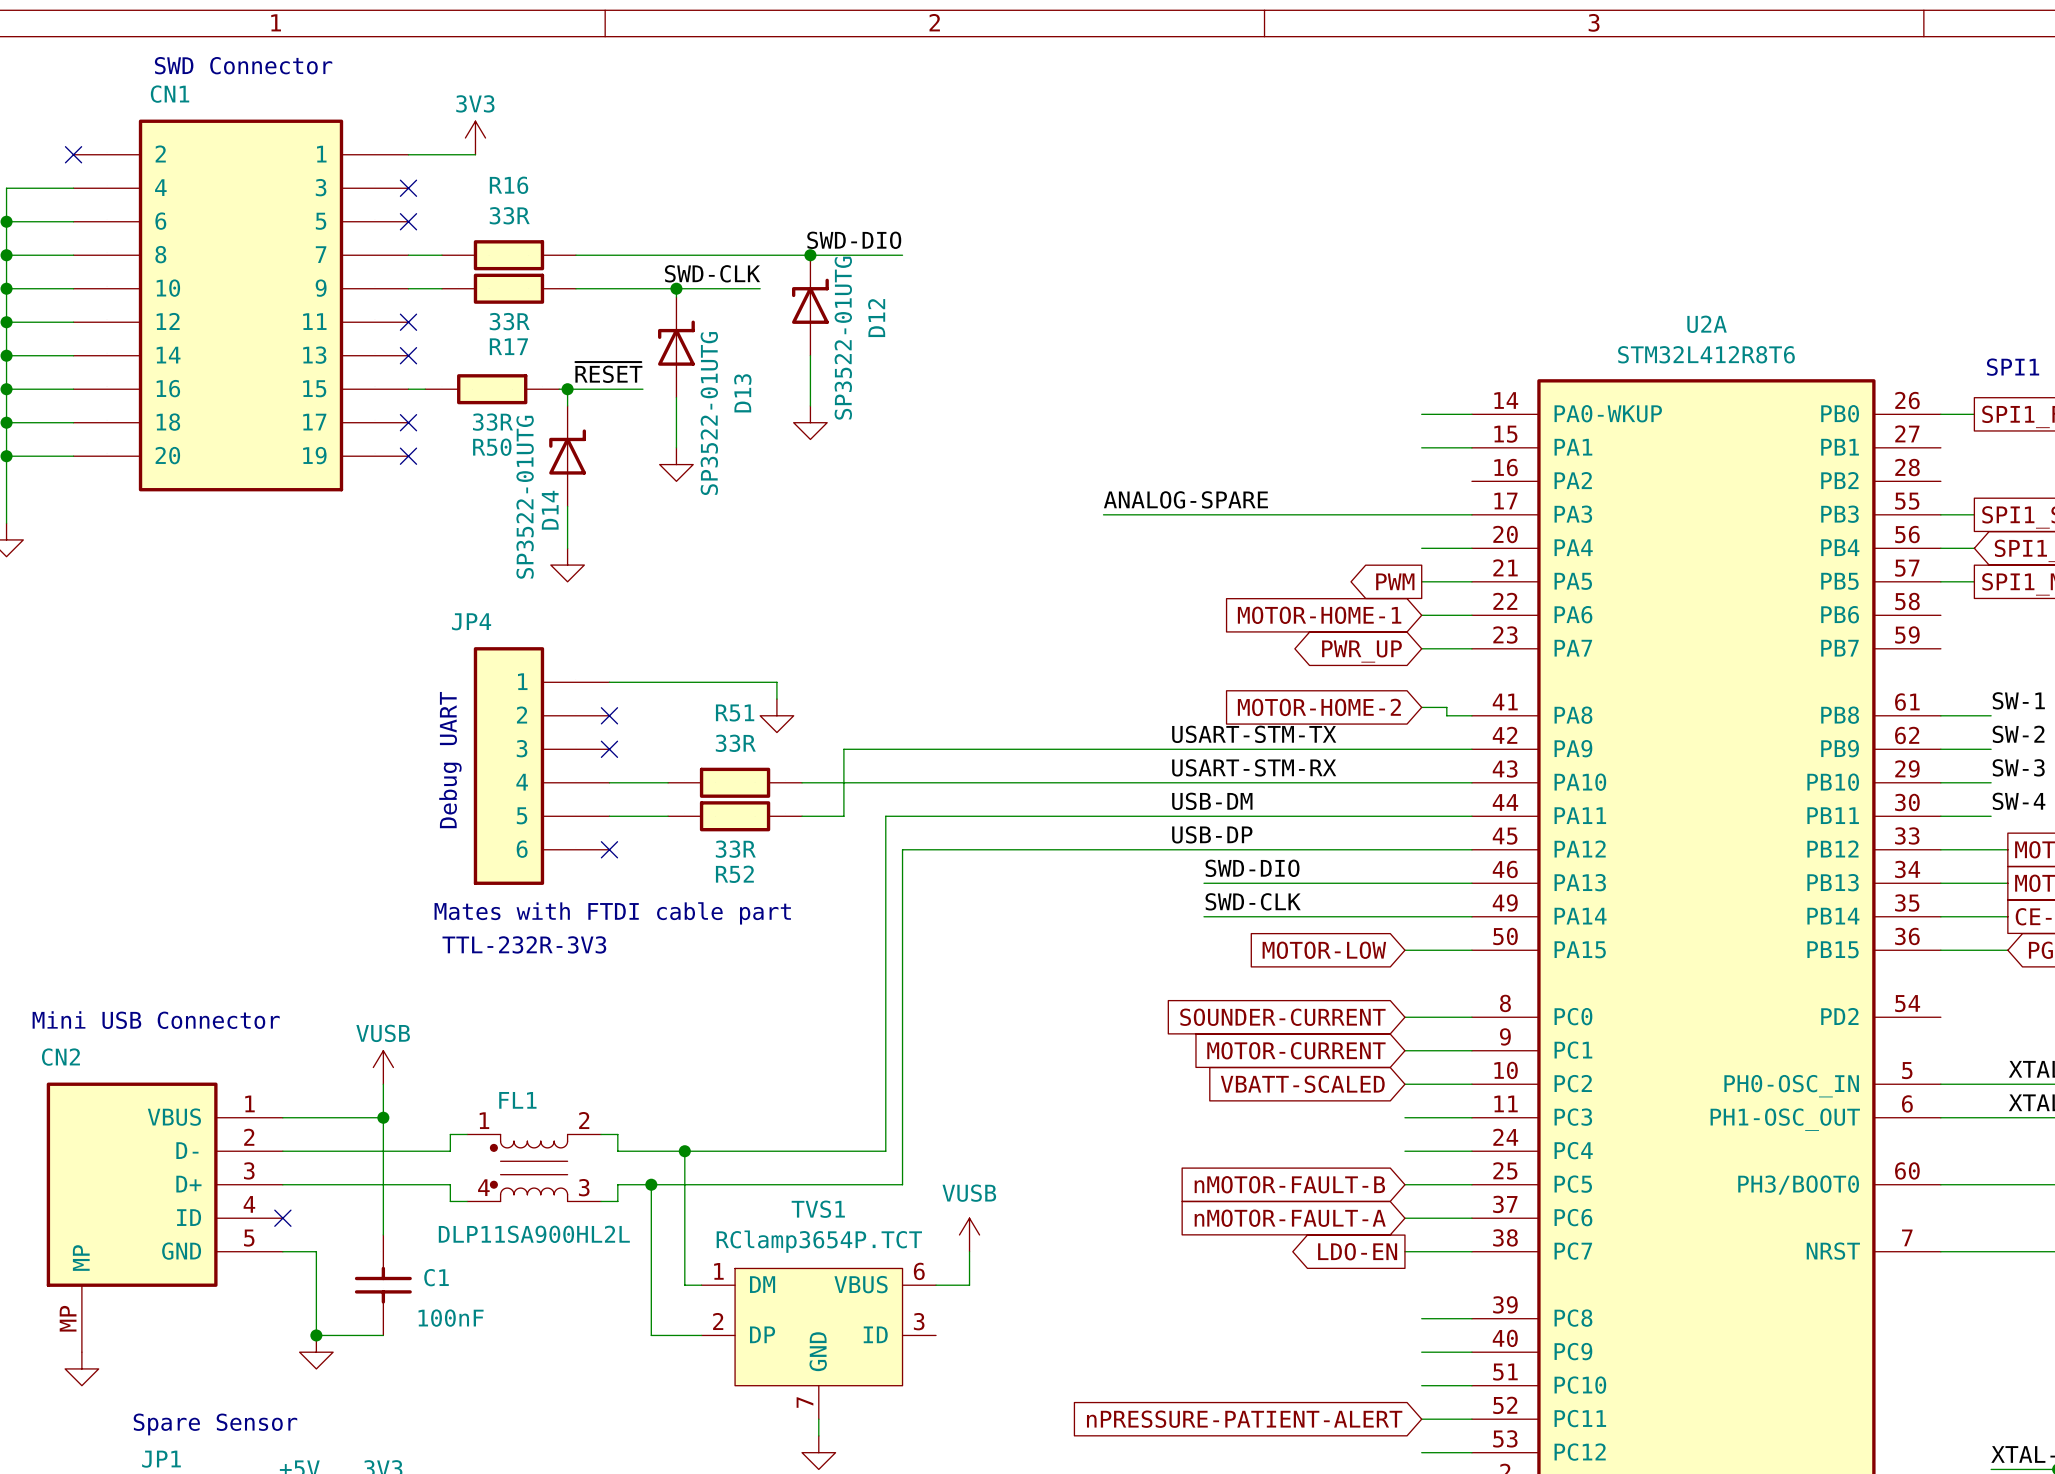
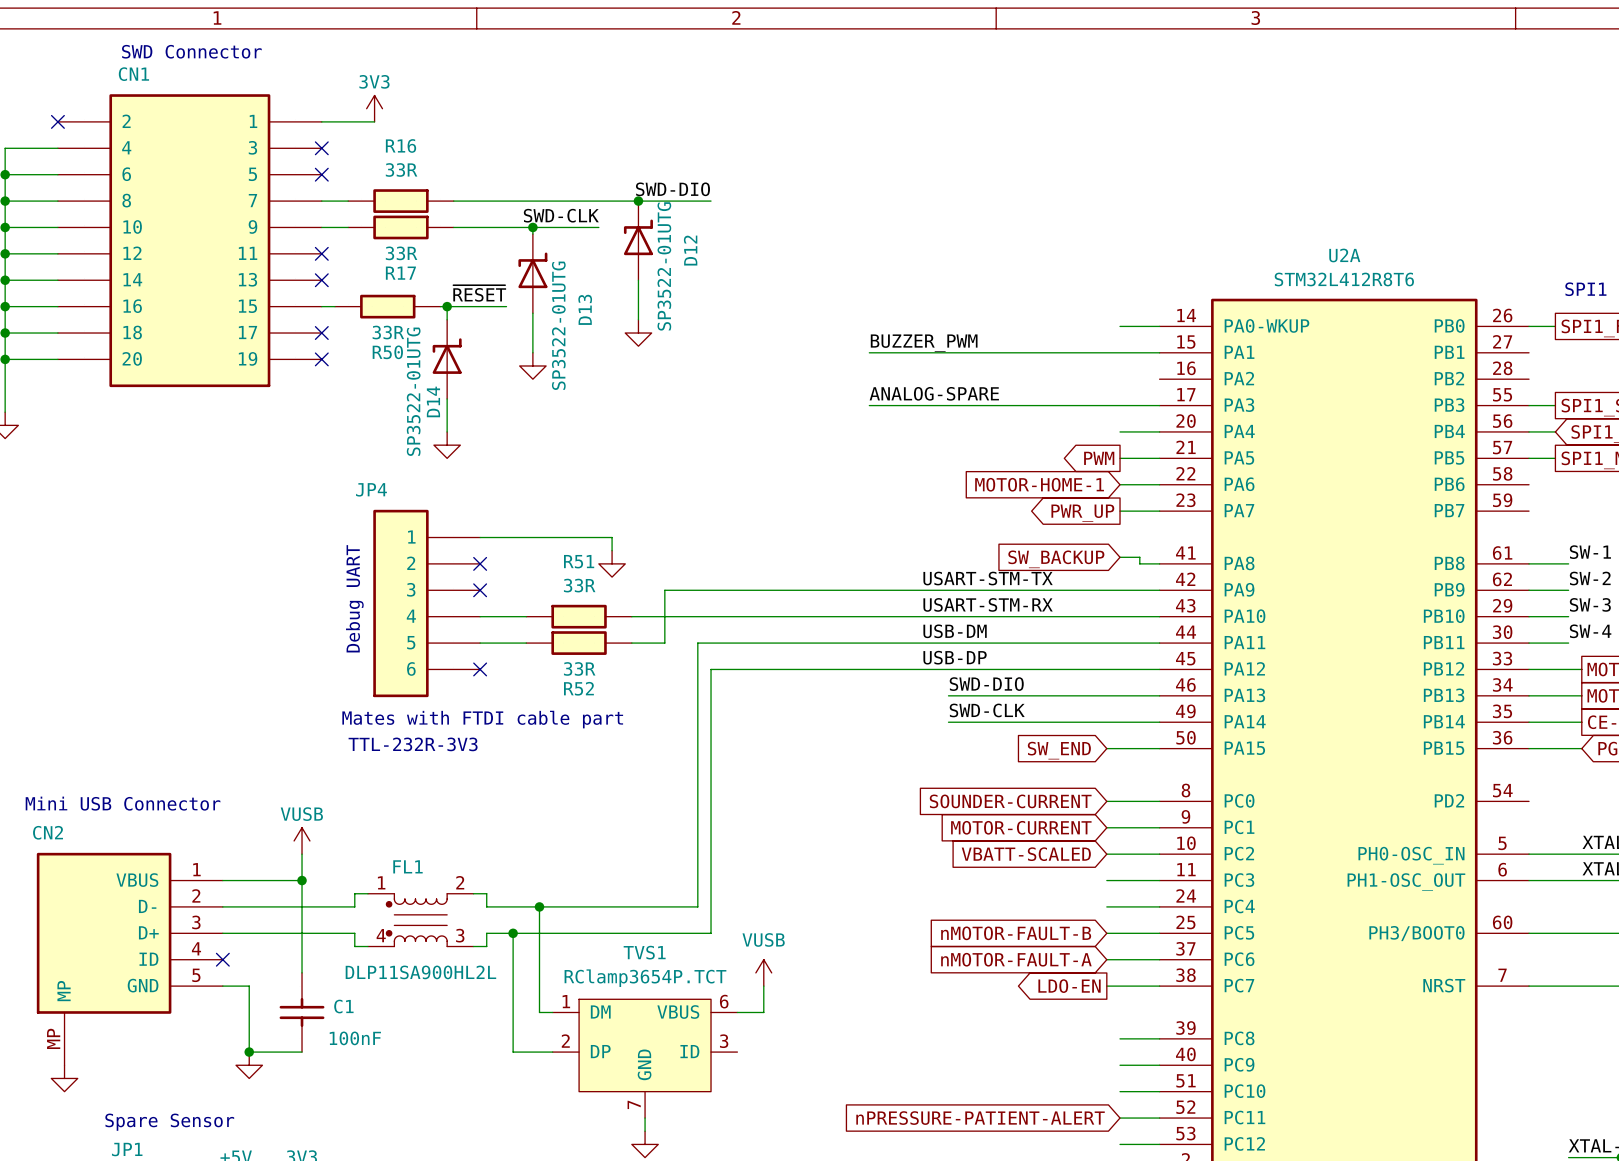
label: none -> BUZZER_PWM (924, 343)
wire: none -> (869, 352) (1120, 352)
global label shape: bidirectional (1361, 651) -> output (1082, 513)
global label: MOTOR-HOME-2 (1319, 707) -> SW_BACKUP (1056, 559)
global label: MOTOR-LOW (1324, 950) -> SW_END (1059, 750)

